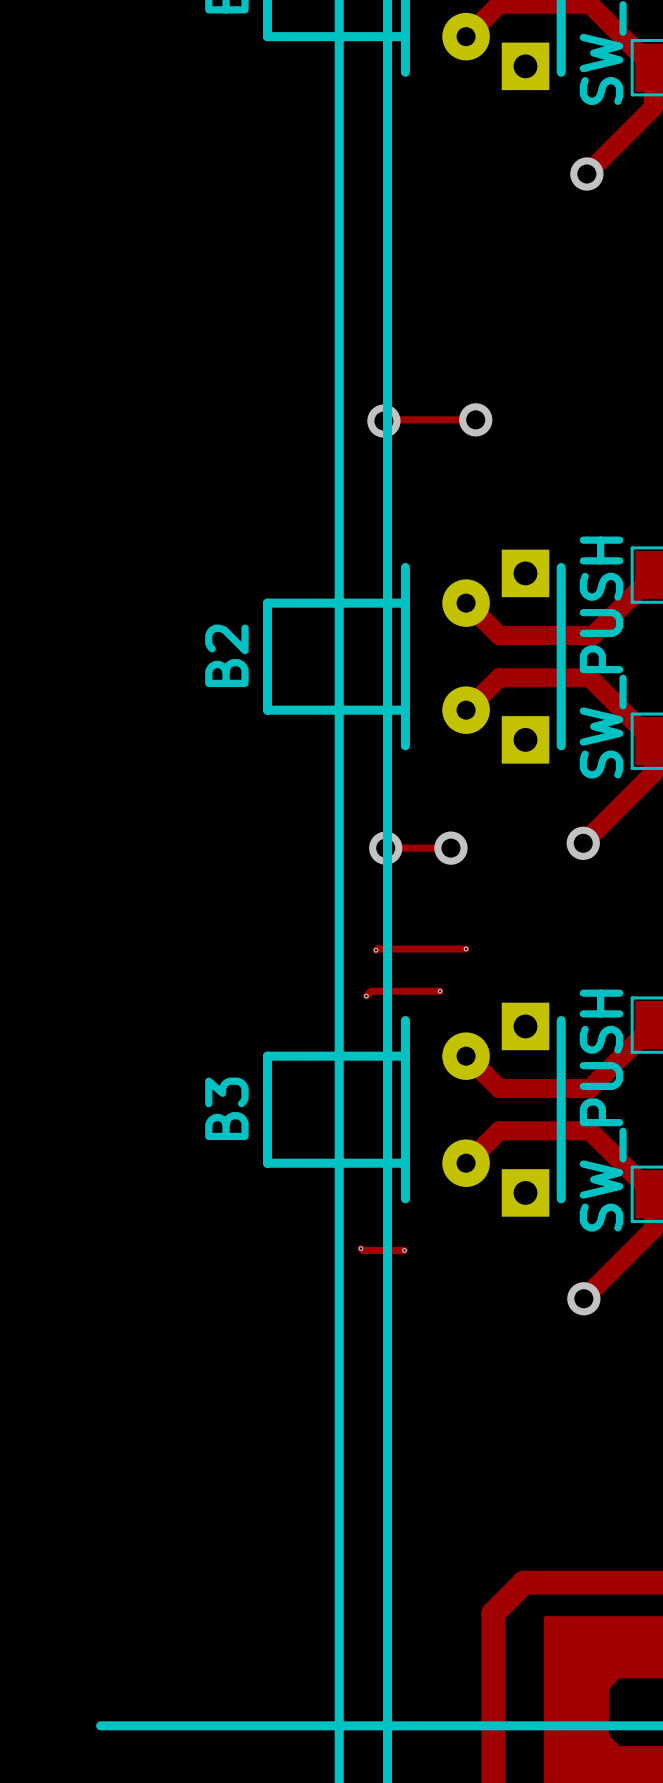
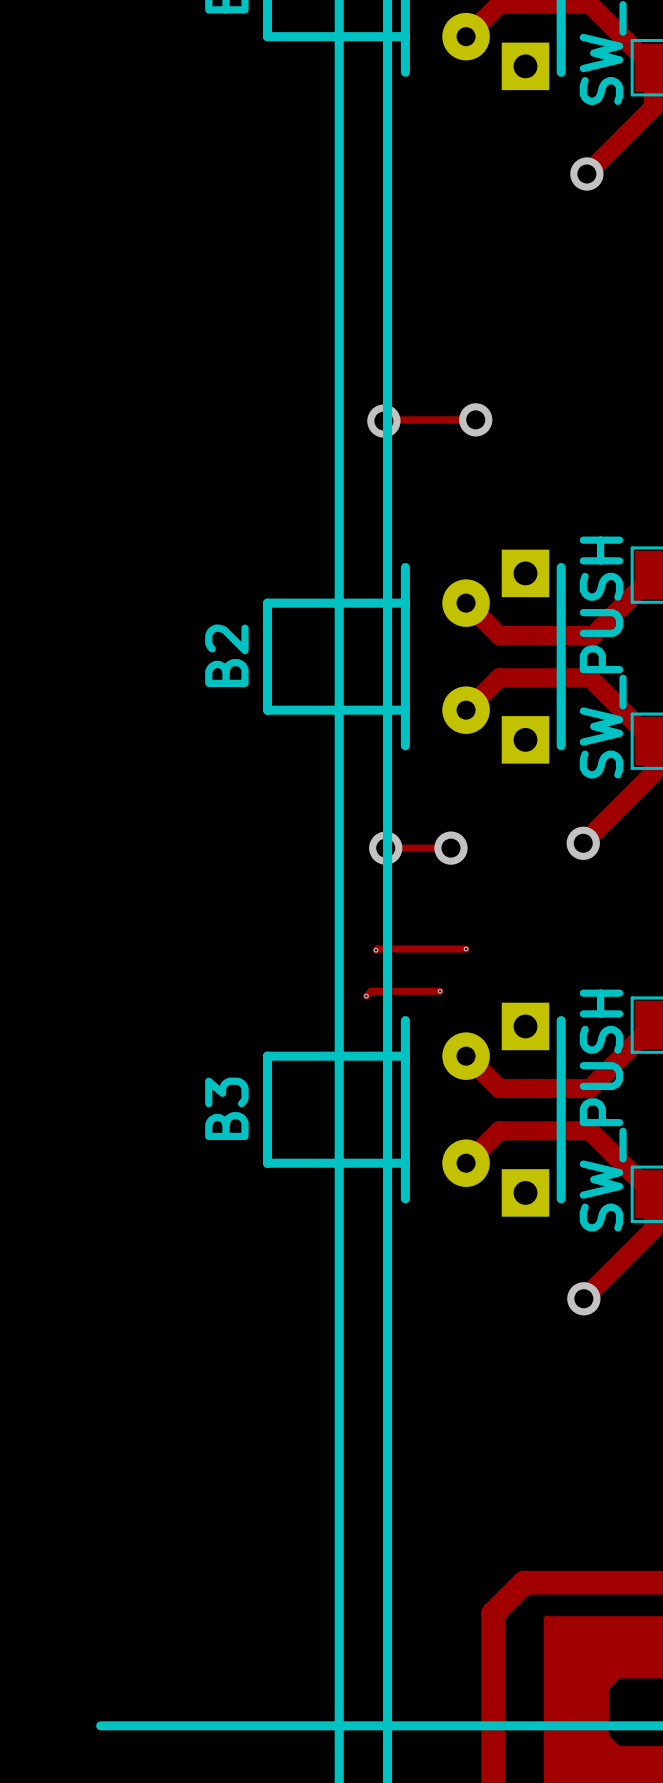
track: (360, 1248) (362, 1250) (404, 1250) -> none
via: (360, 1248) -> none
via: (404, 1250) -> none

